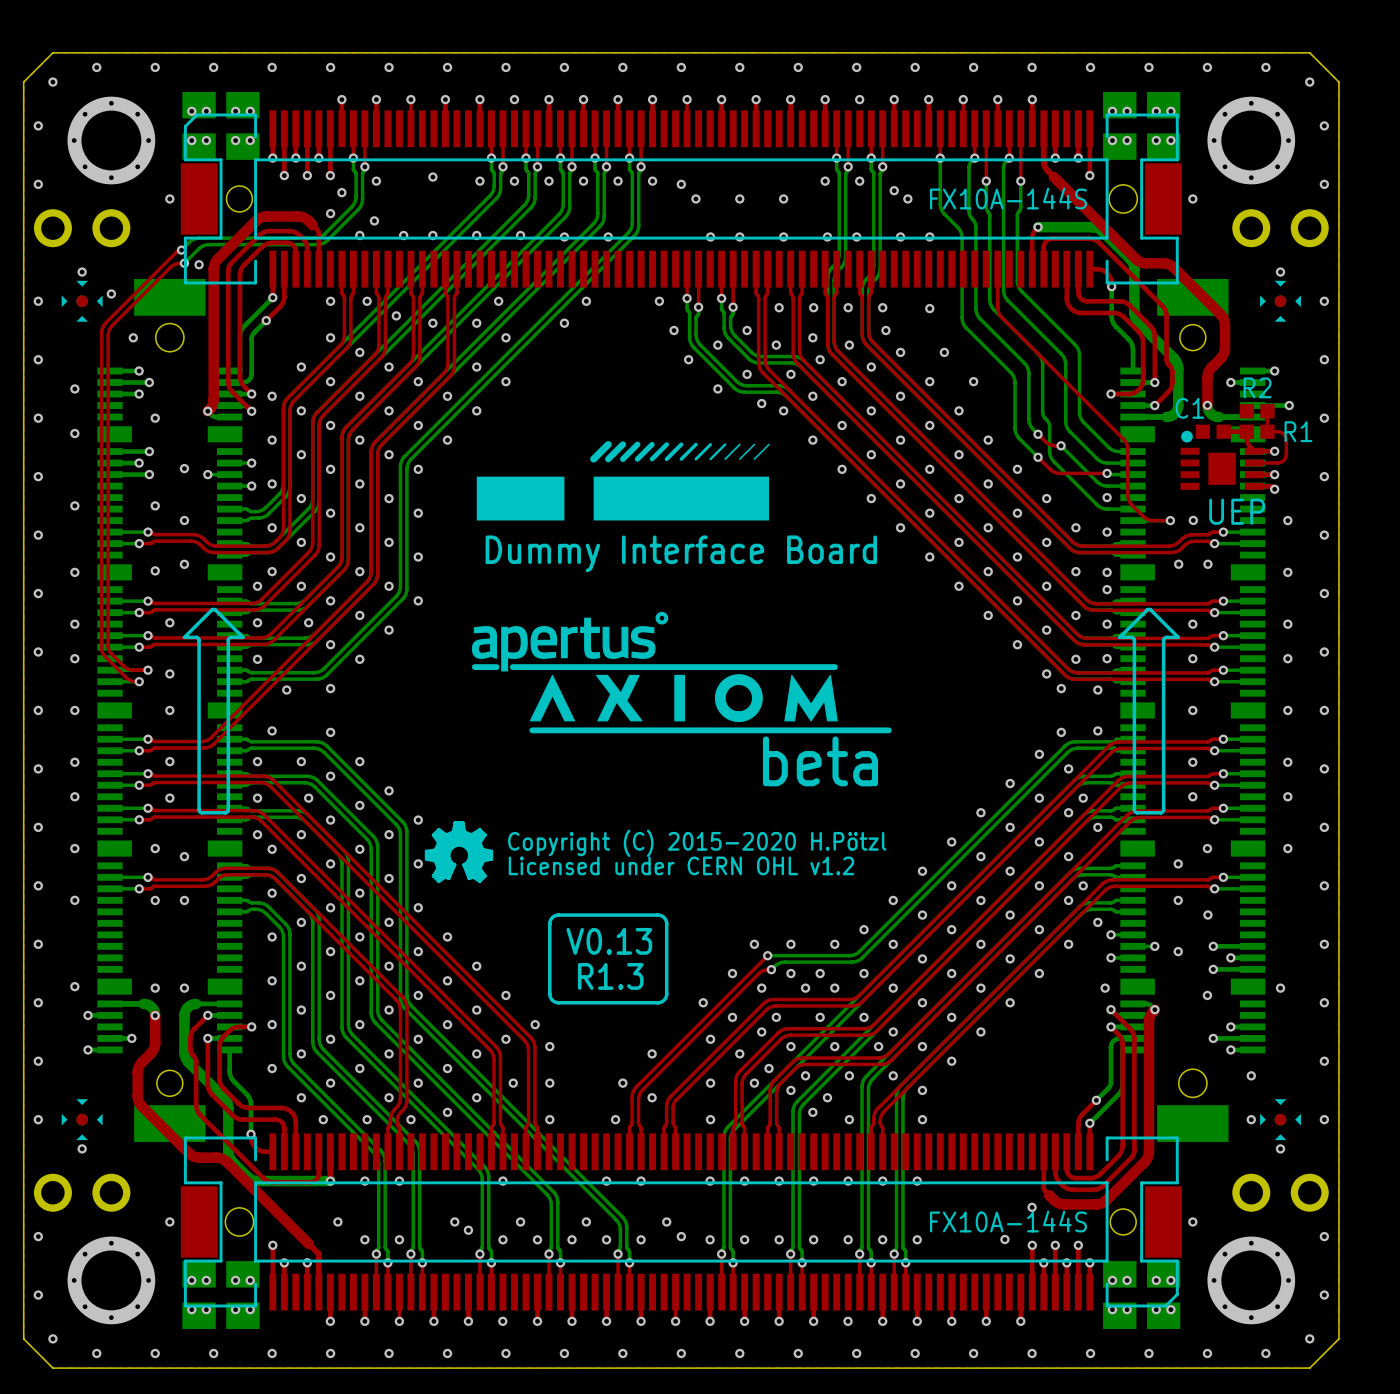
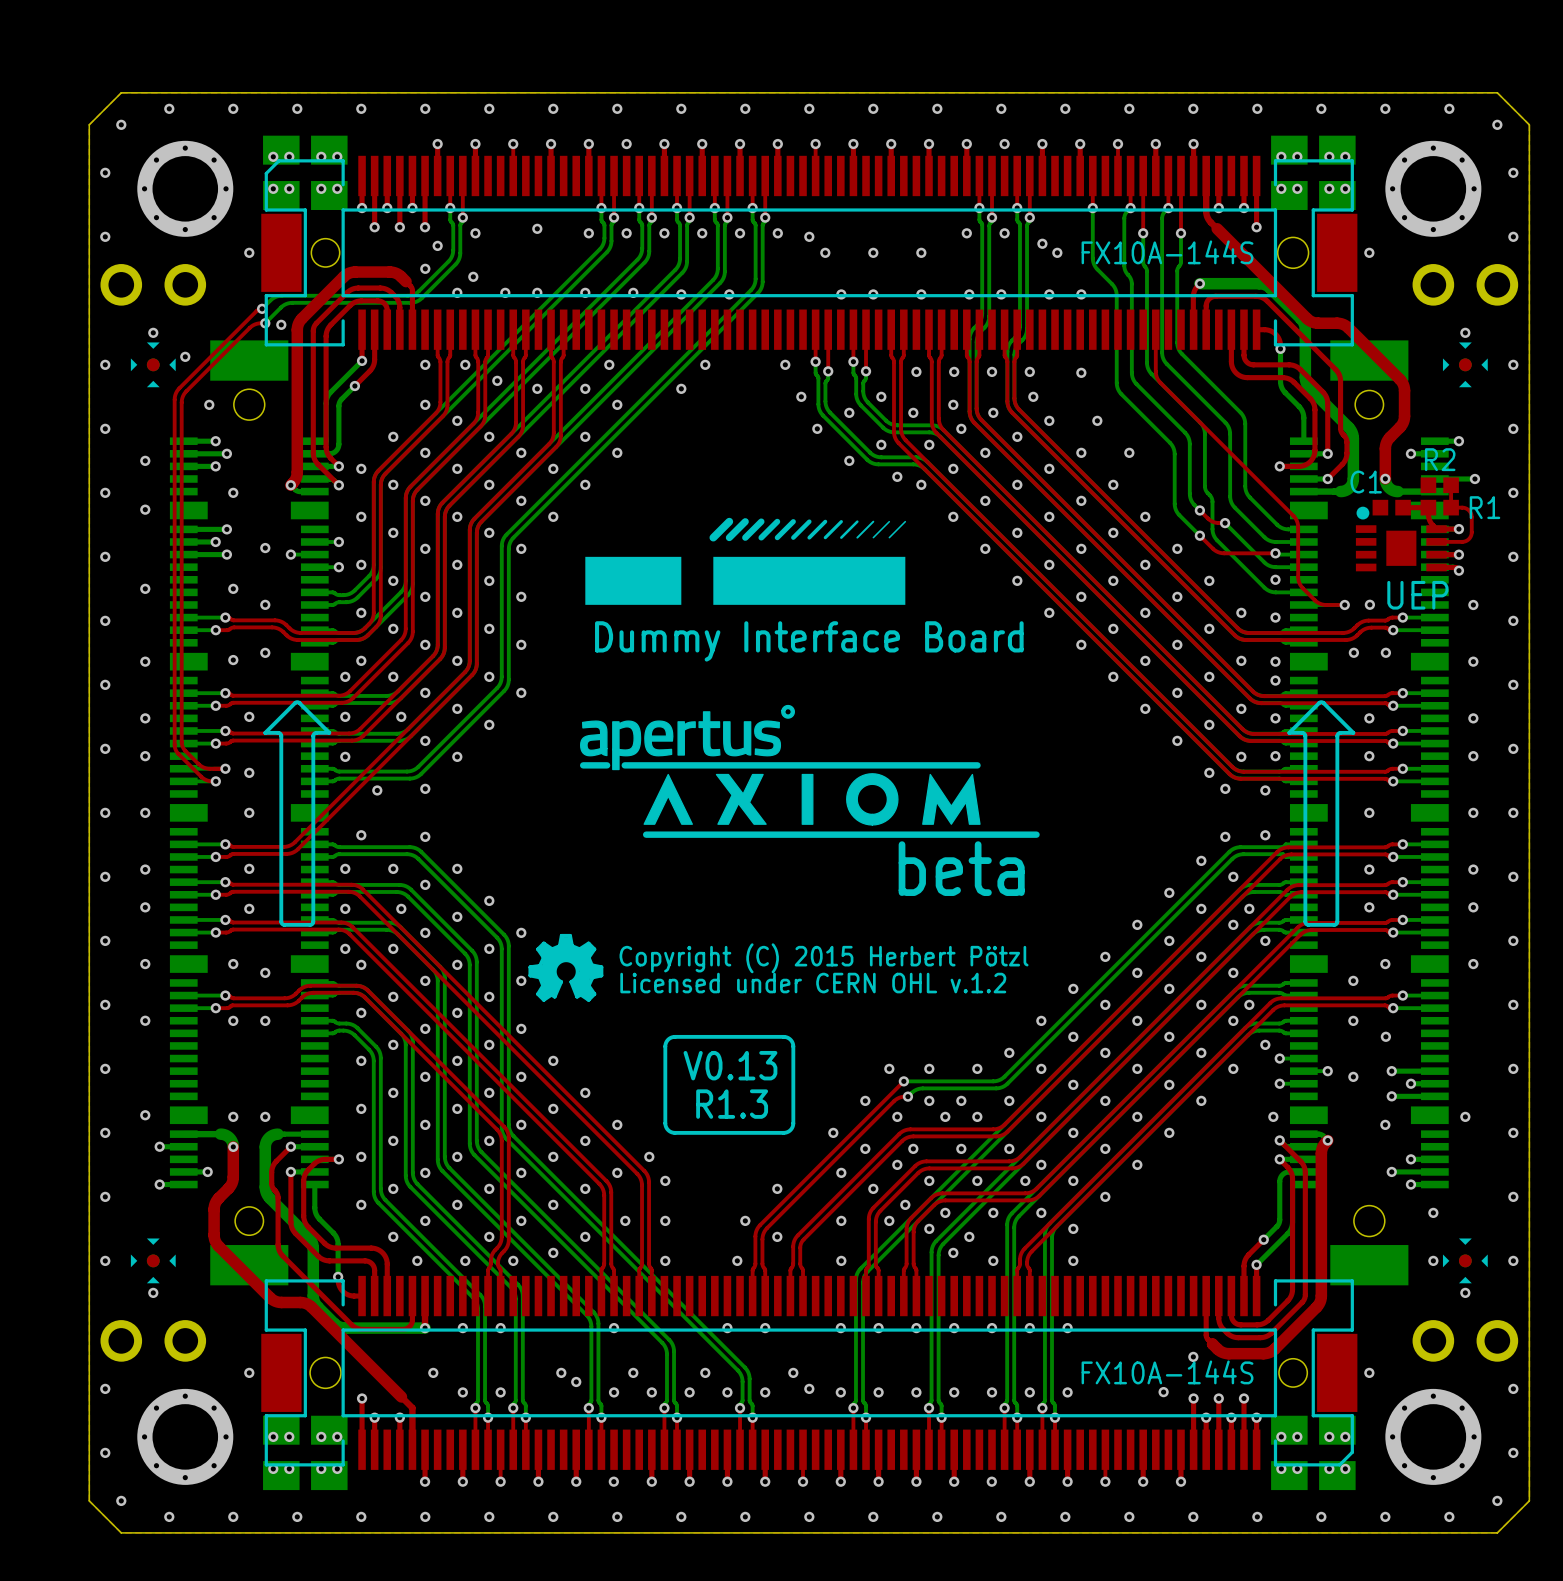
text: Copyright (C) 2015-2020 H.Pötzl (697, 843) -> Copyright (C) 2015 Herbert Pötzl (824, 958)
text: Licensed under CERN OHL v1.2 (681, 865) -> Licensed under CERN OHL v.1.2 (813, 983)

